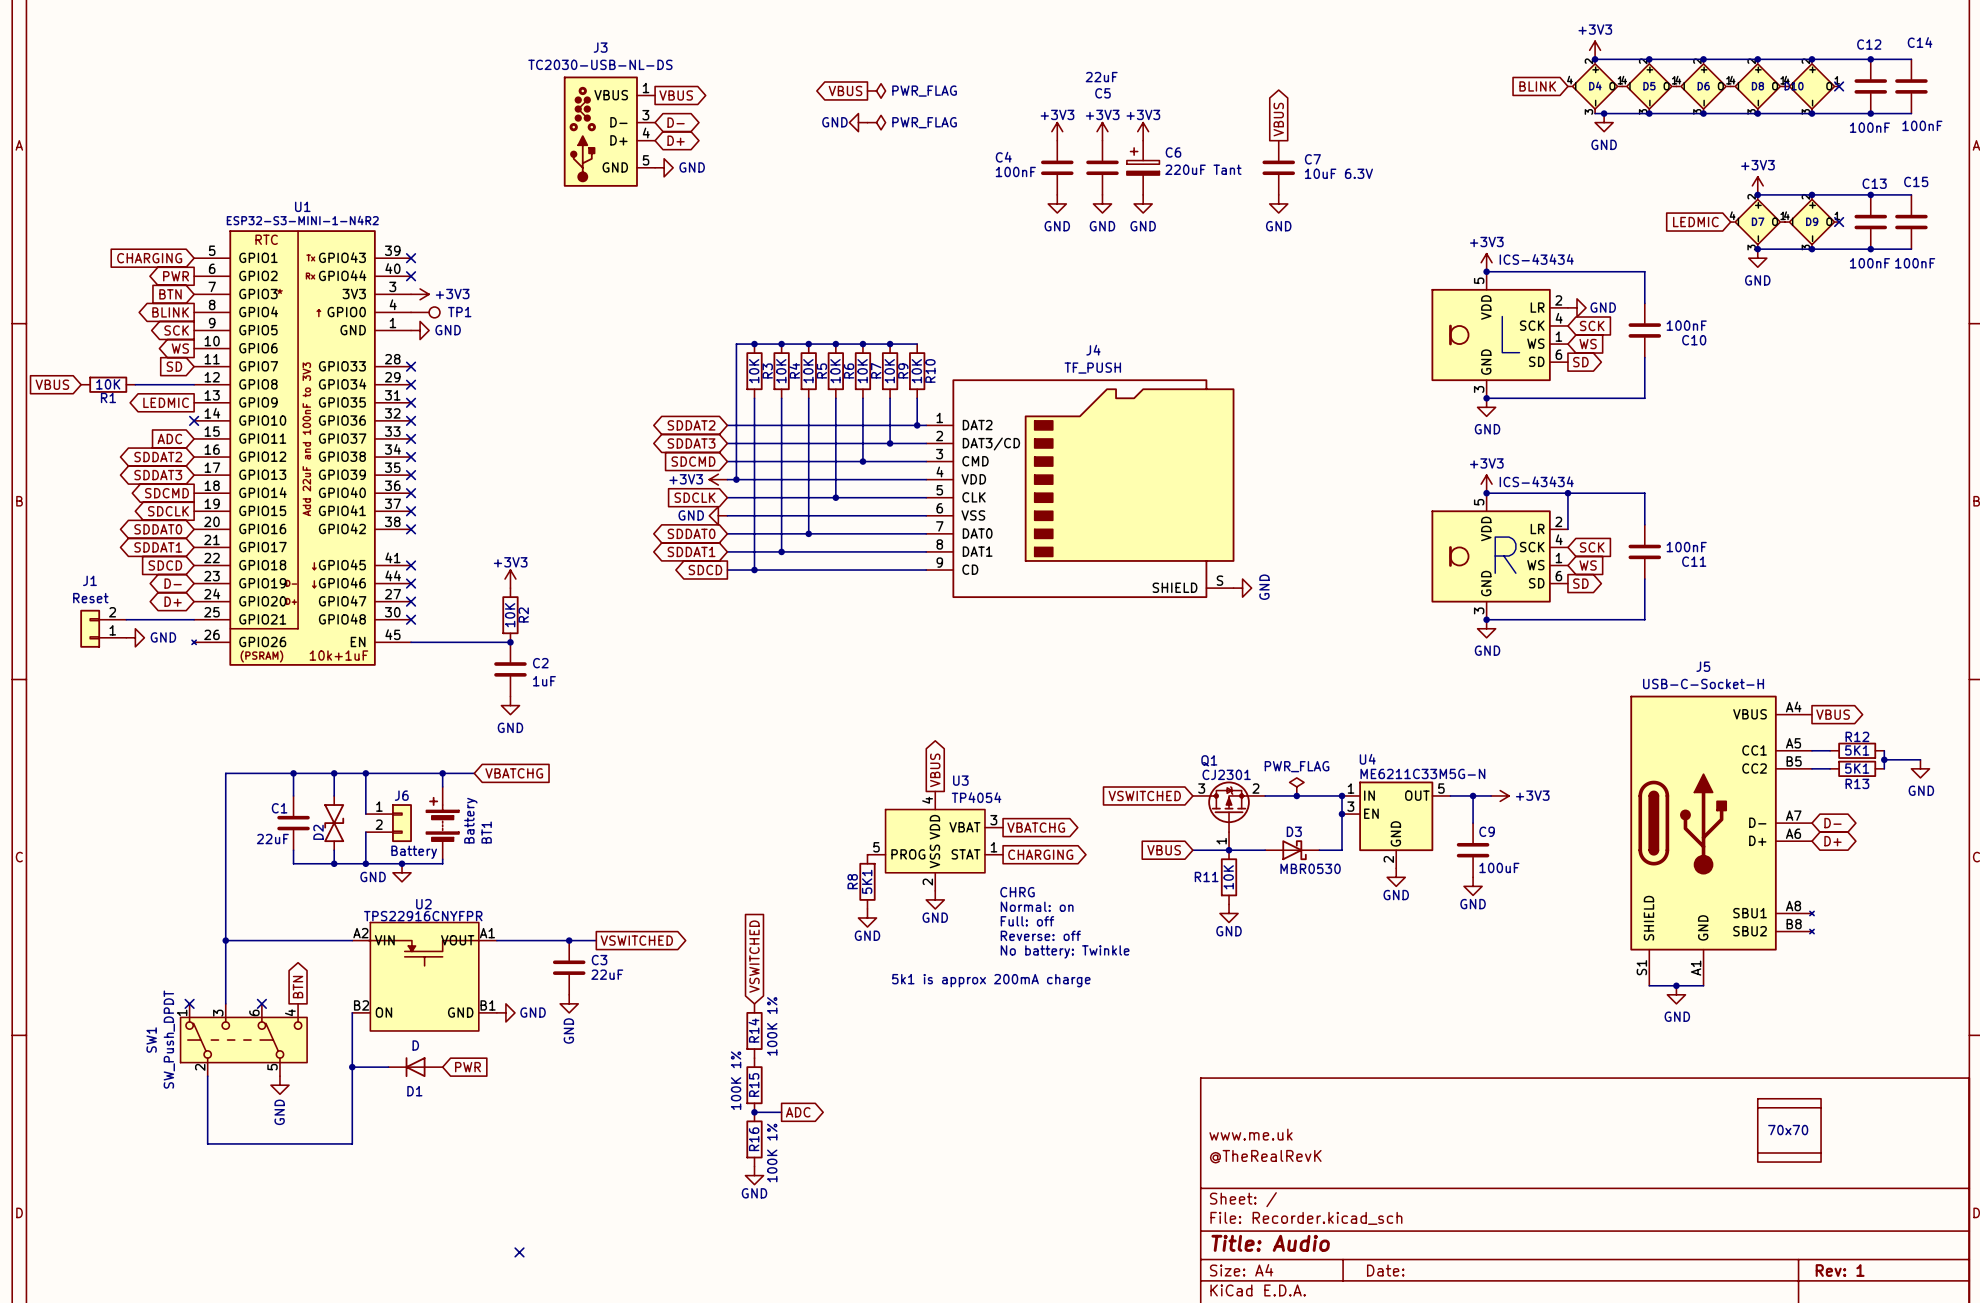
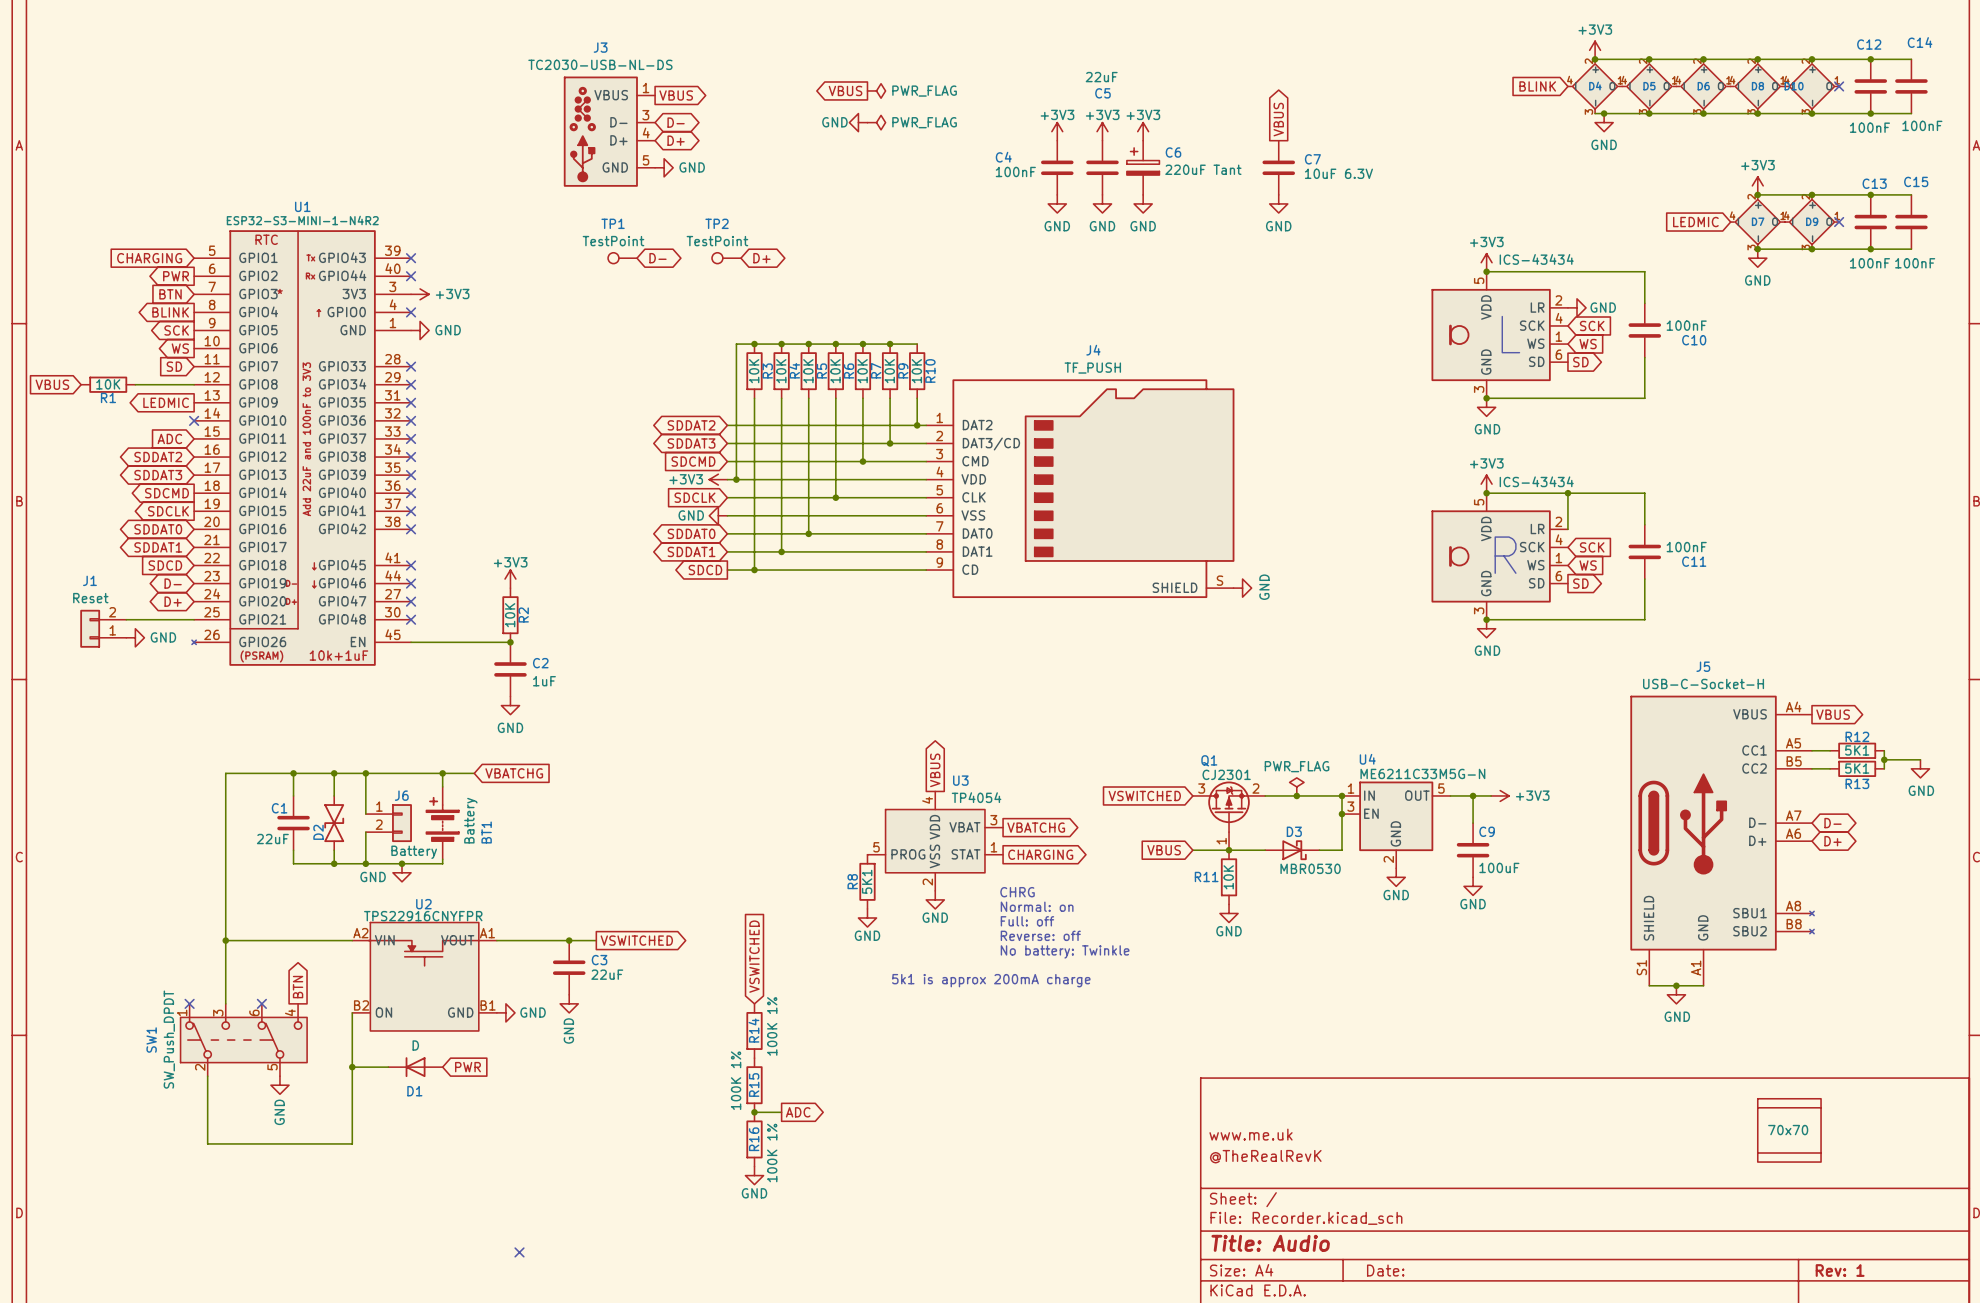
TP1 value: none -> TestPoint (613, 241)
global label: none -> D- (657, 258)
TP2: none -> TestPoint (726, 258)
global label: none -> D+ (761, 258)
no-connect mark: none -> (411, 312)
TP1 position: (425, 312) -> (622, 258)
TP1 rotation: 0° (434, 312) -> 180° (613, 258)
TP1 name position: TP1 (459, 312) -> TP1 (613, 223)

